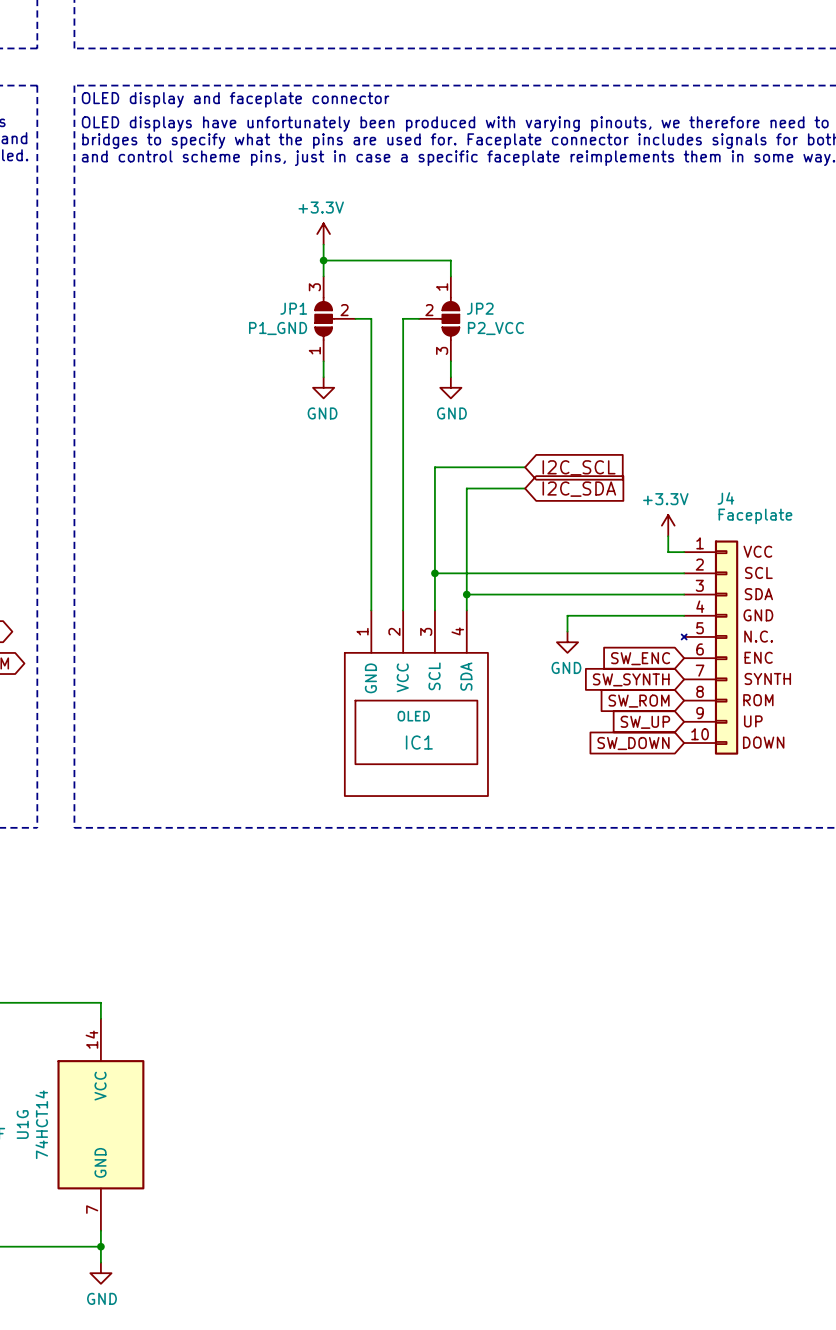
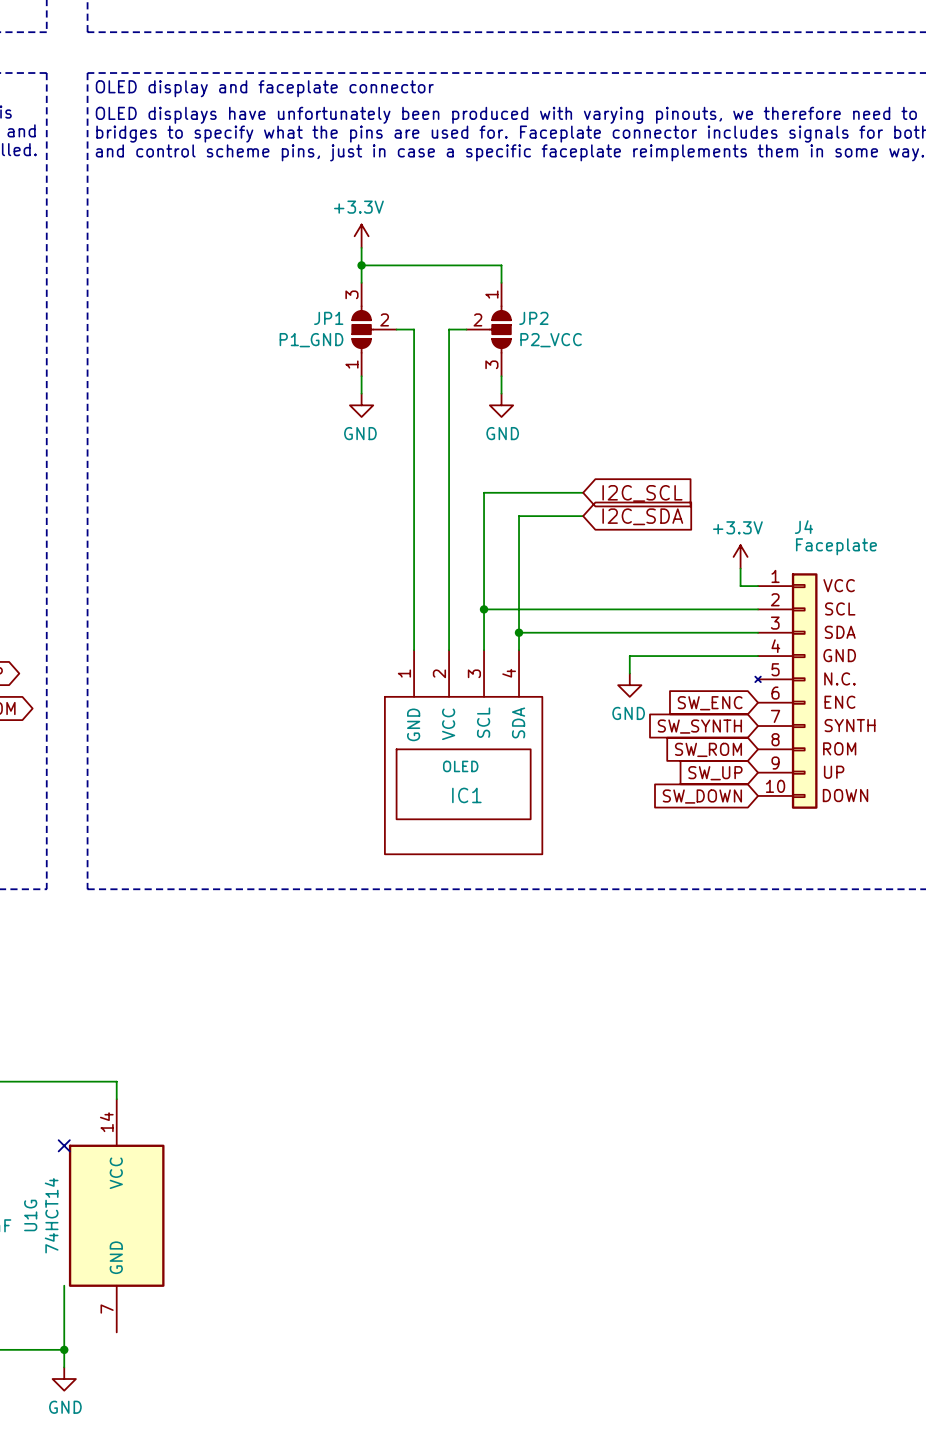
no-connect mark: none -> (64, 1145)
wire: none -> (64, 1285) (64, 1367)
wire: (100, 1230) (100, 1262) -> none
wire: (53, 1246) (100, 1246) -> none
junction position: (100, 1246) -> (64, 1349)
power symbol position: GND (100, 1273) -> GND (64, 1379)

